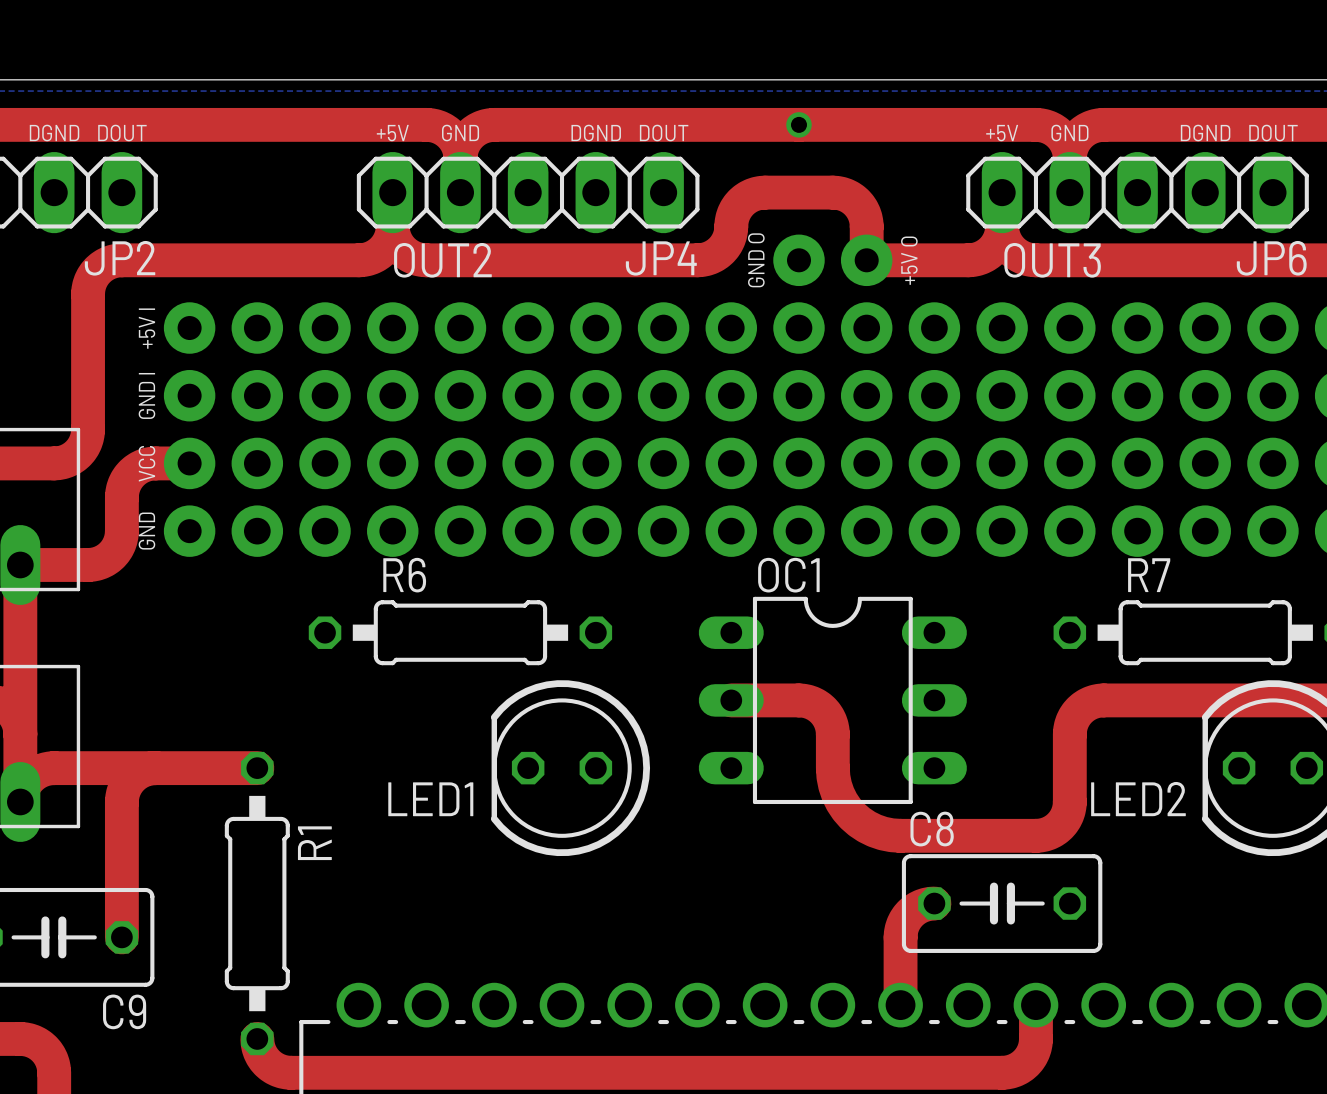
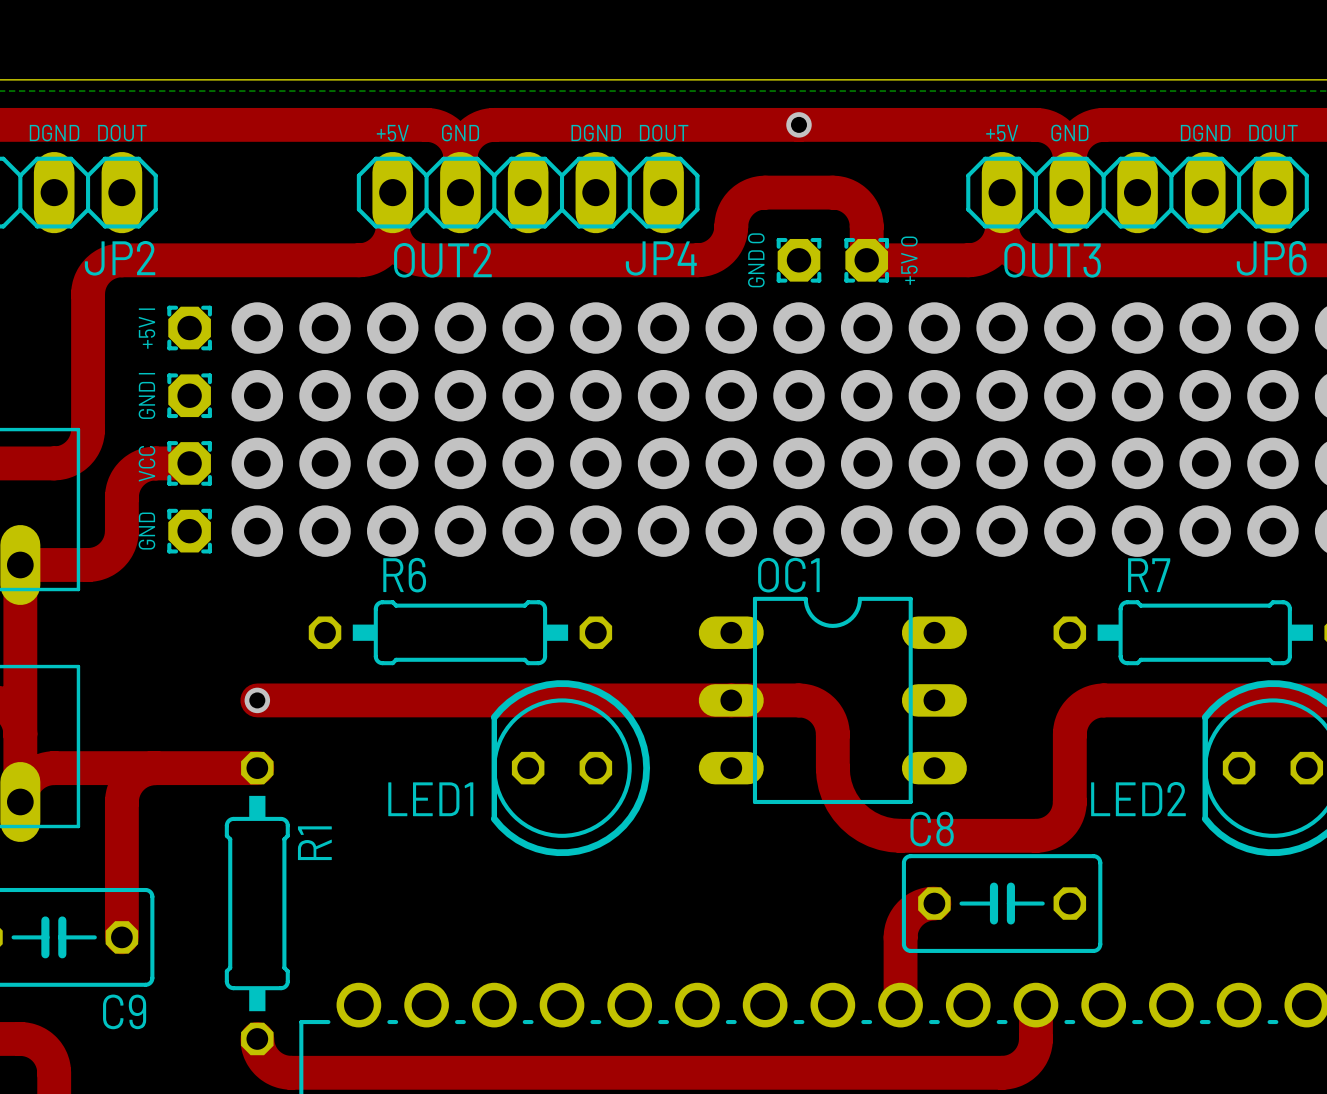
part footprint: [773, 234, 825, 287] -> [776, 237, 822, 283]
part footprint: [840, 234, 893, 287] -> [844, 237, 890, 283]
part footprint: [163, 302, 216, 354] -> [167, 305, 212, 351]
part footprint: [163, 369, 216, 422] -> [167, 373, 212, 419]
part footprint: [163, 437, 216, 490] -> [167, 441, 212, 486]
part footprint: [163, 505, 216, 557] -> [167, 508, 212, 554]
top track: none -> (257, 700) (731, 700)
via: none -> (257, 700)

